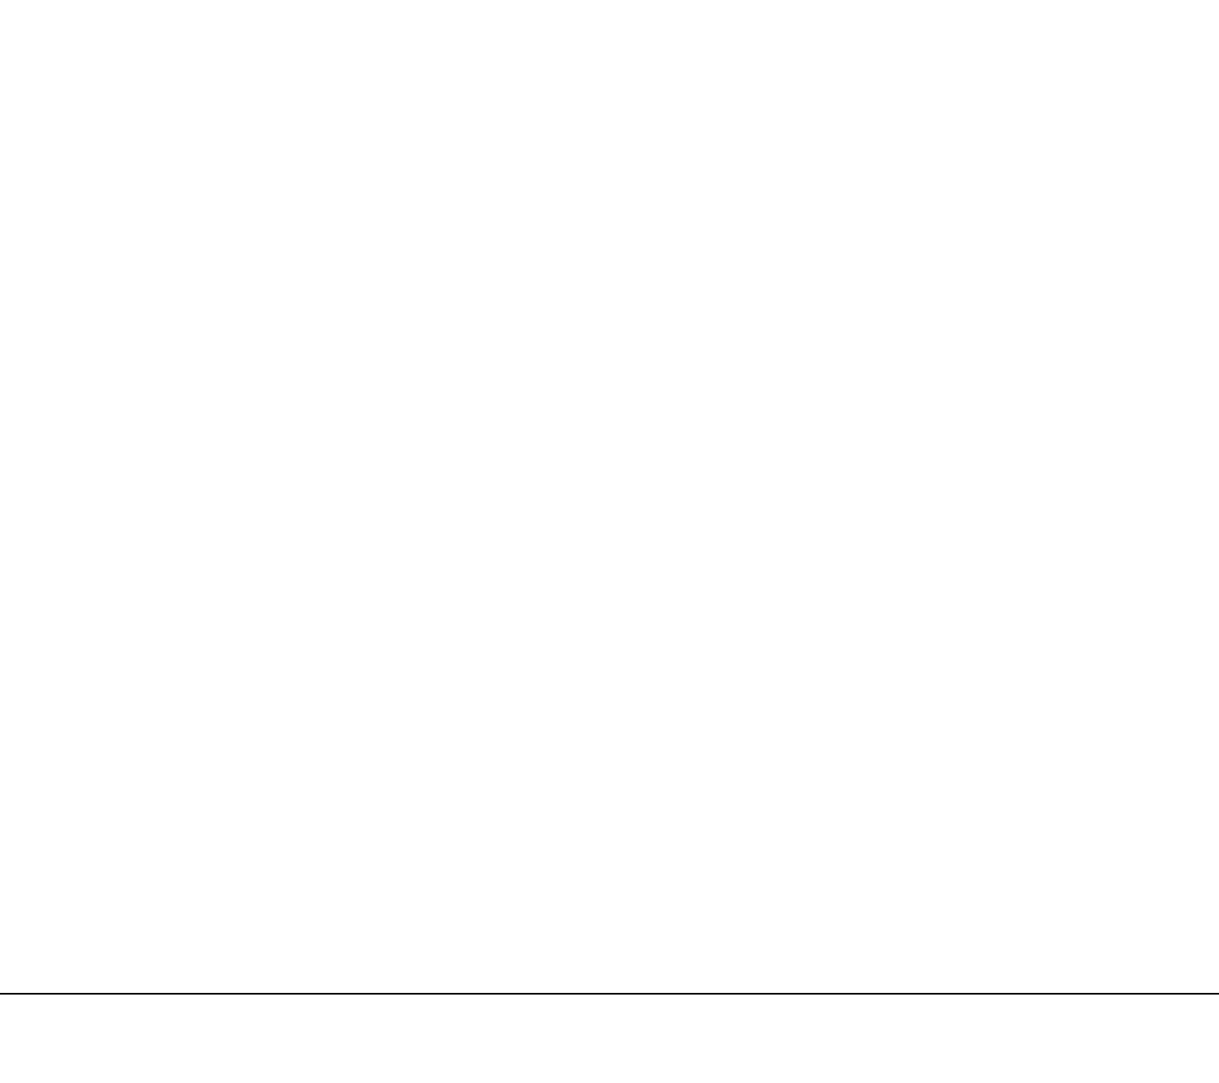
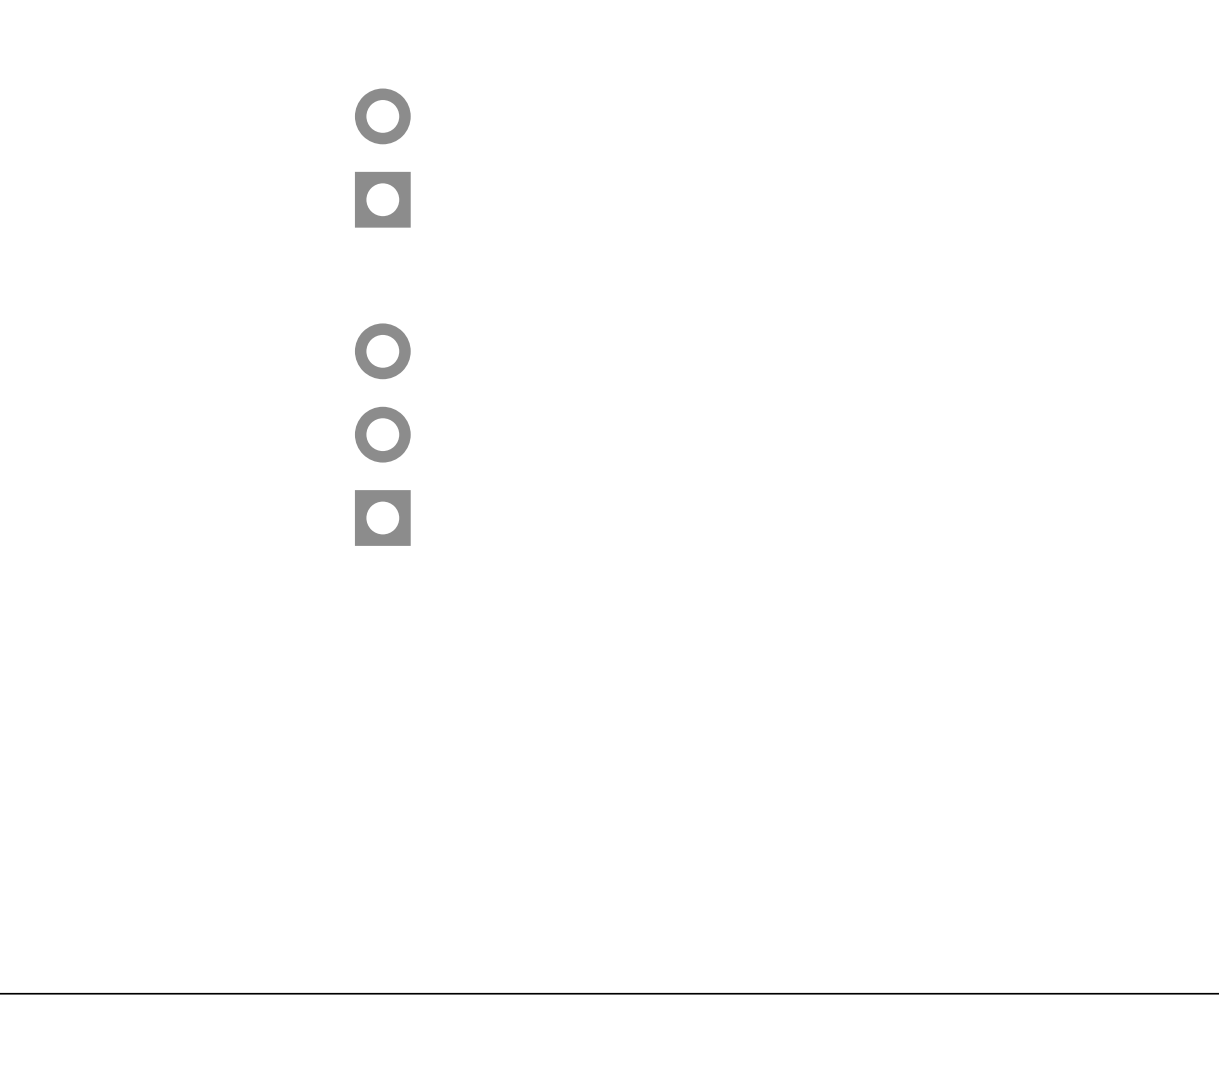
part: none -> (382, 158)
part: none -> (382, 434)

